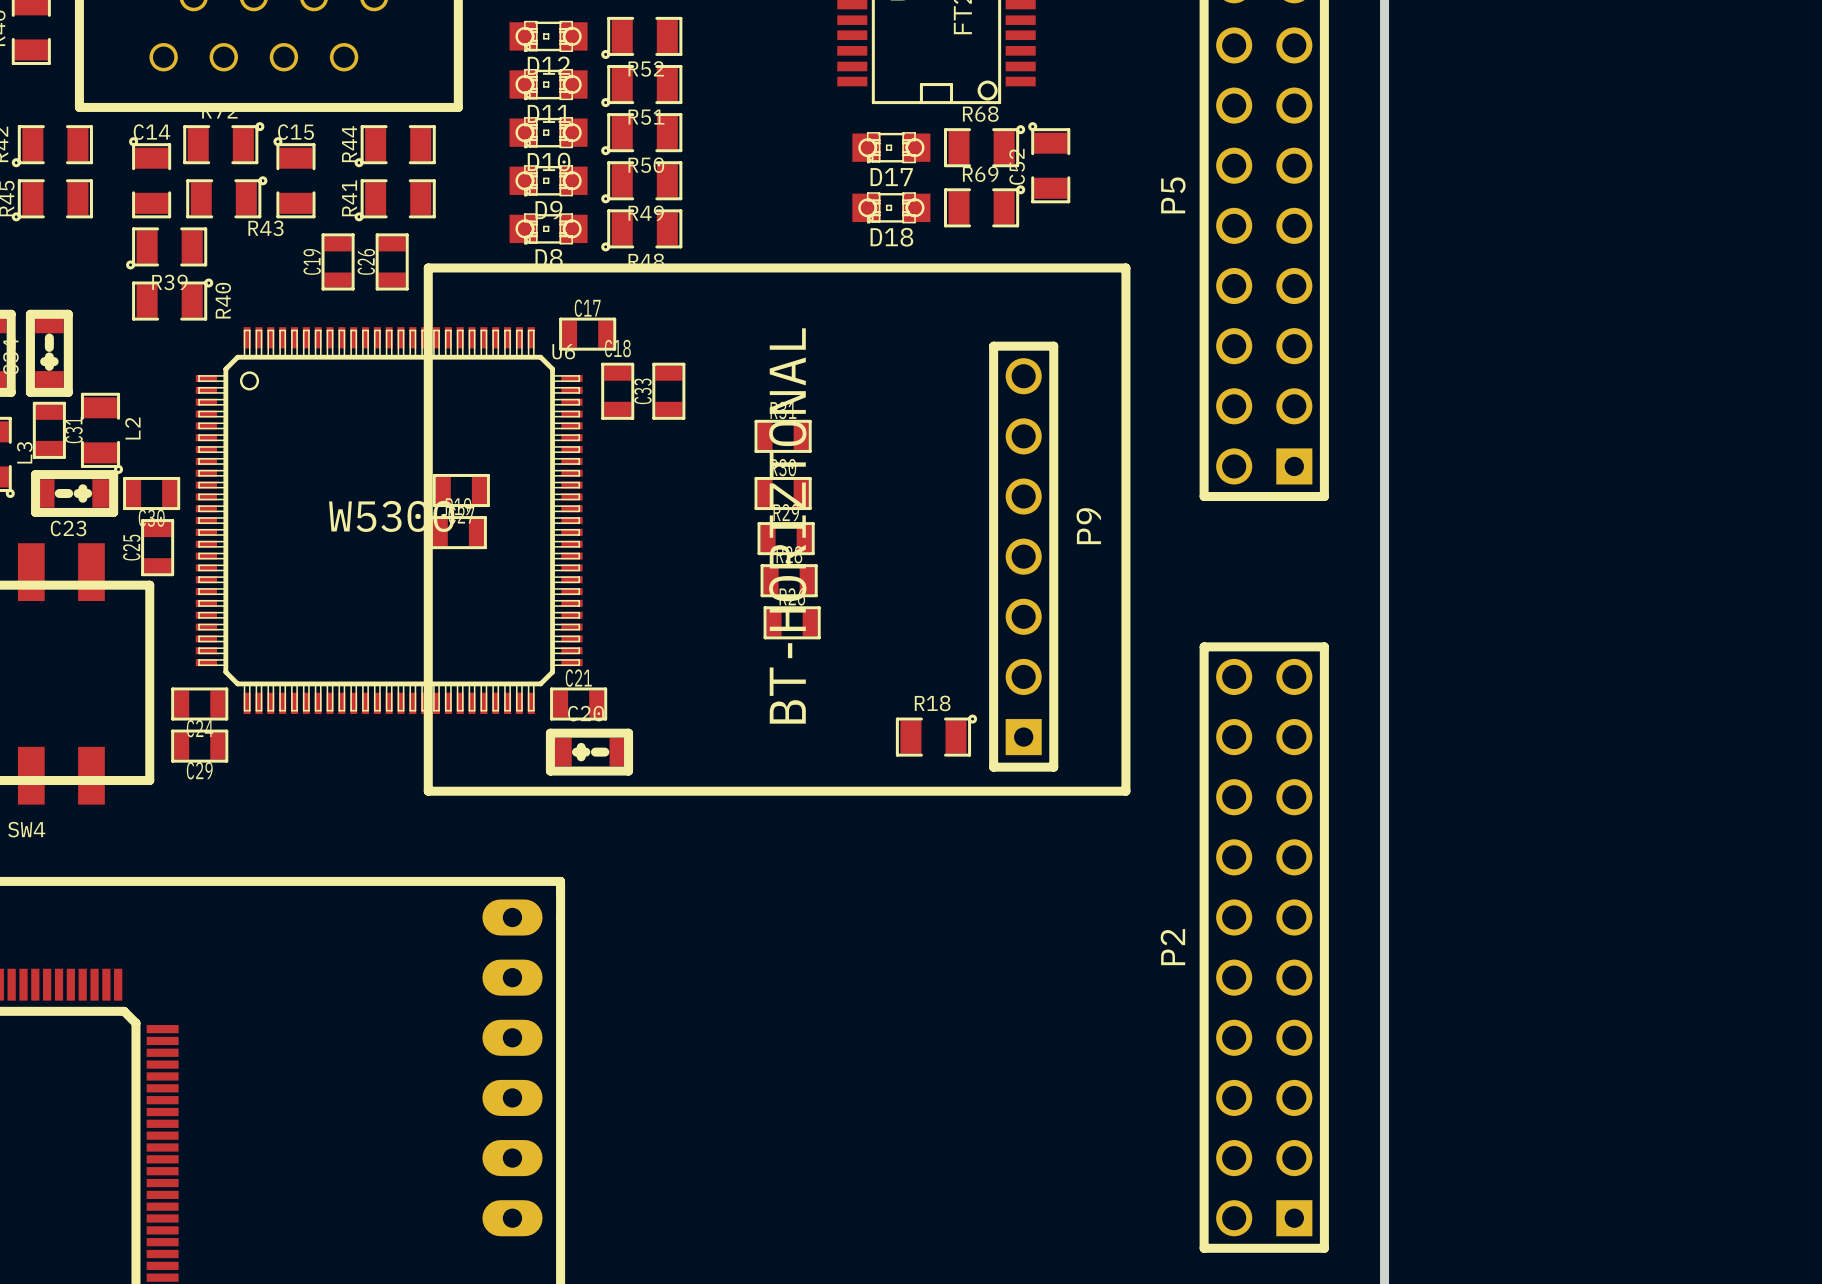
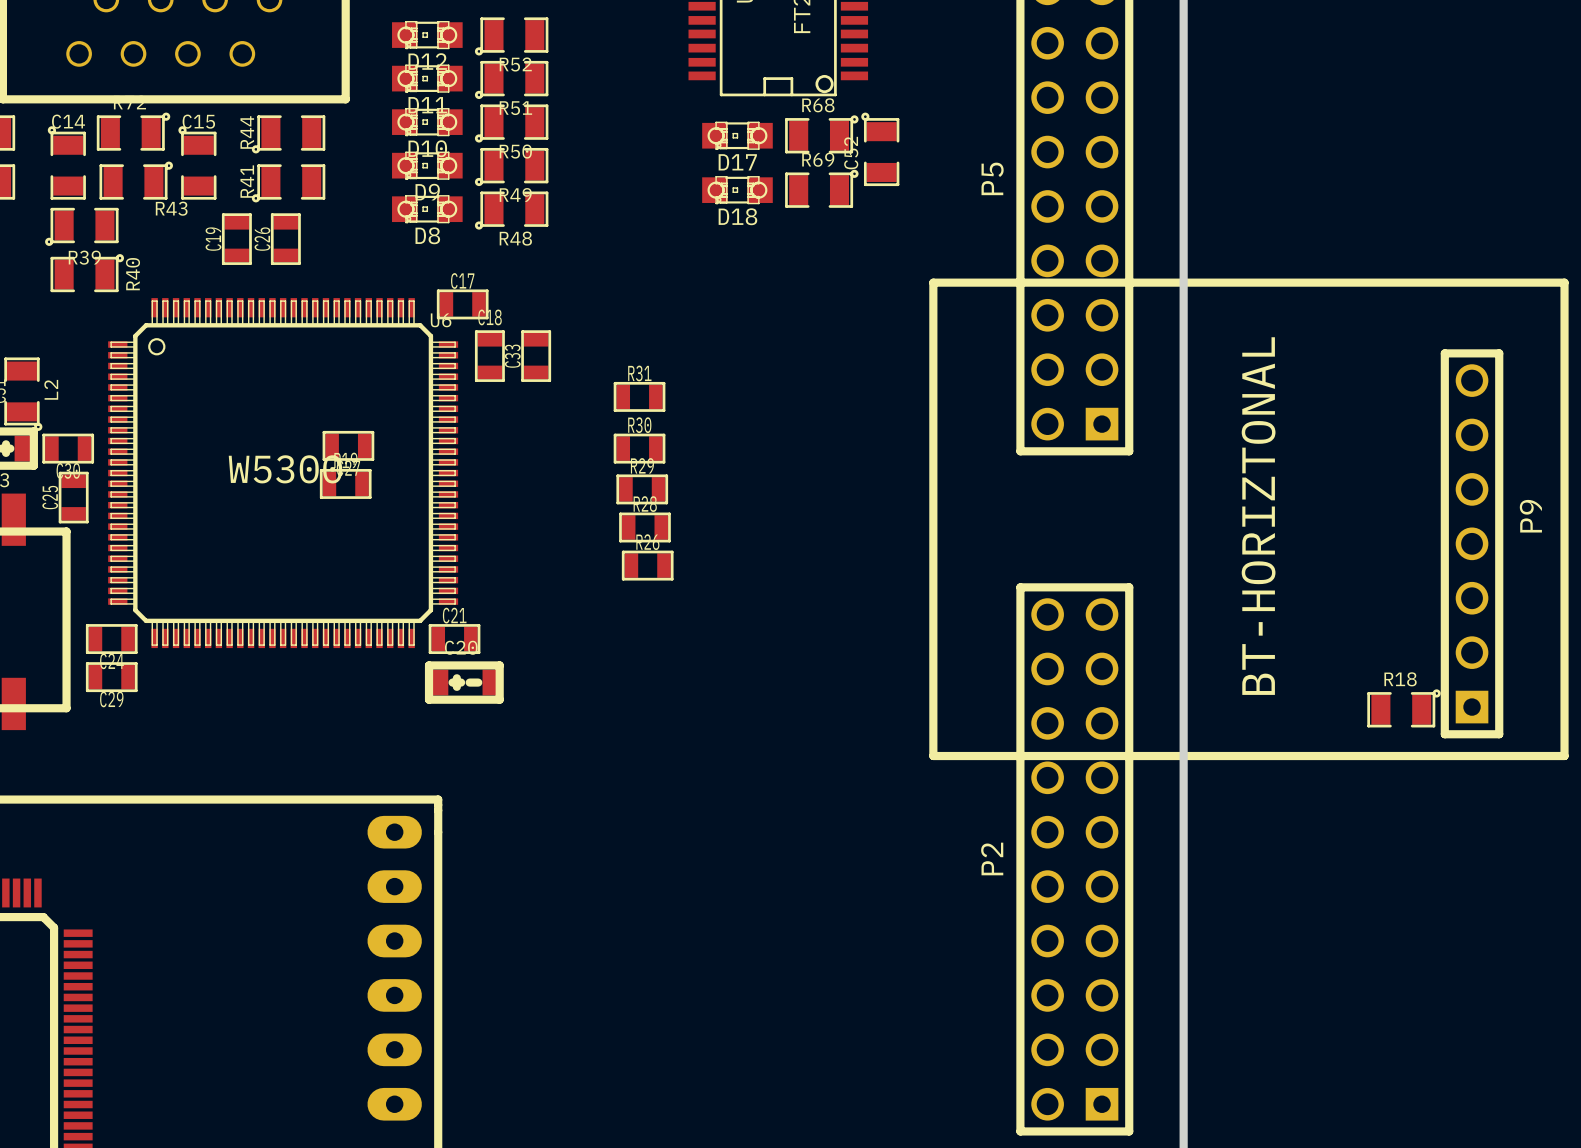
P9 position: (777, 529) -> (1248, 519)
R18 position: (936, 735) -> (1404, 708)

